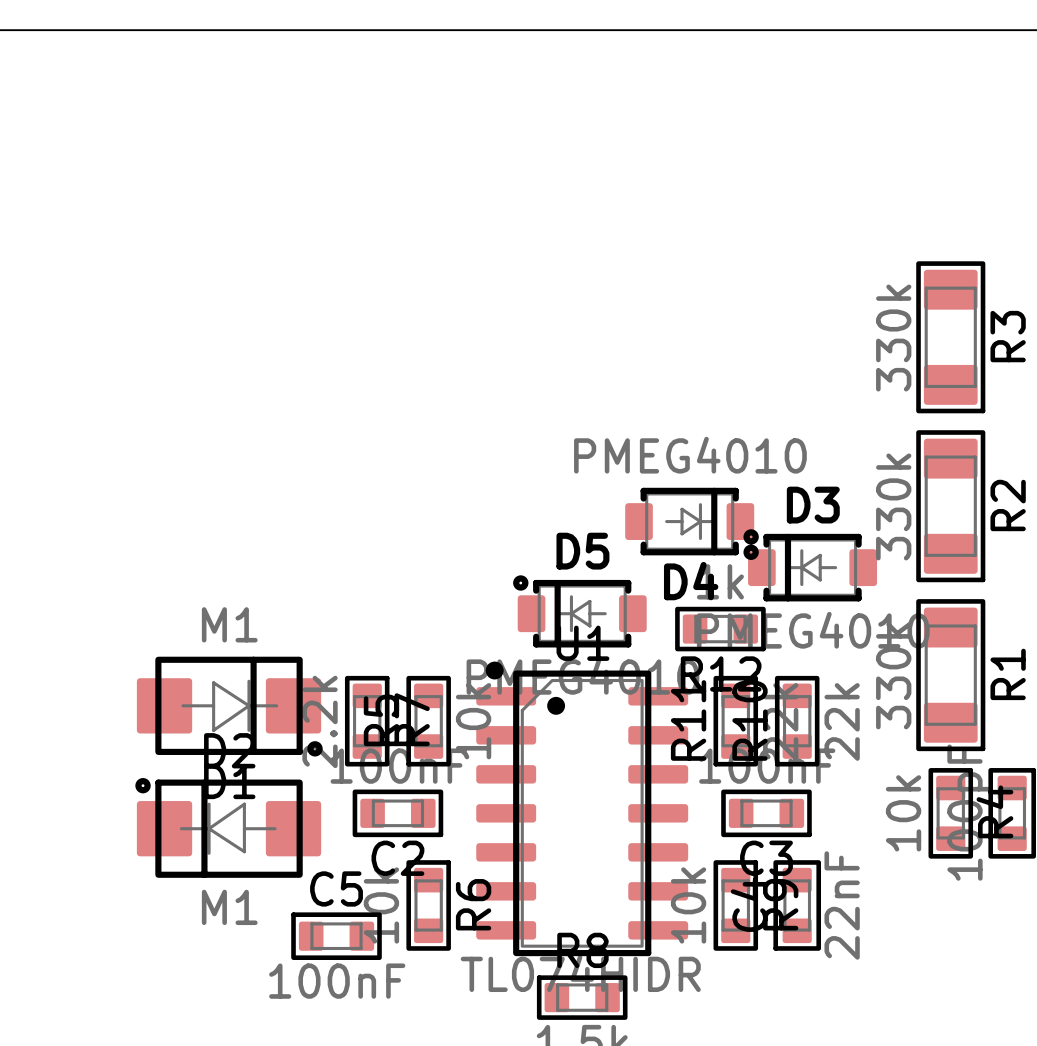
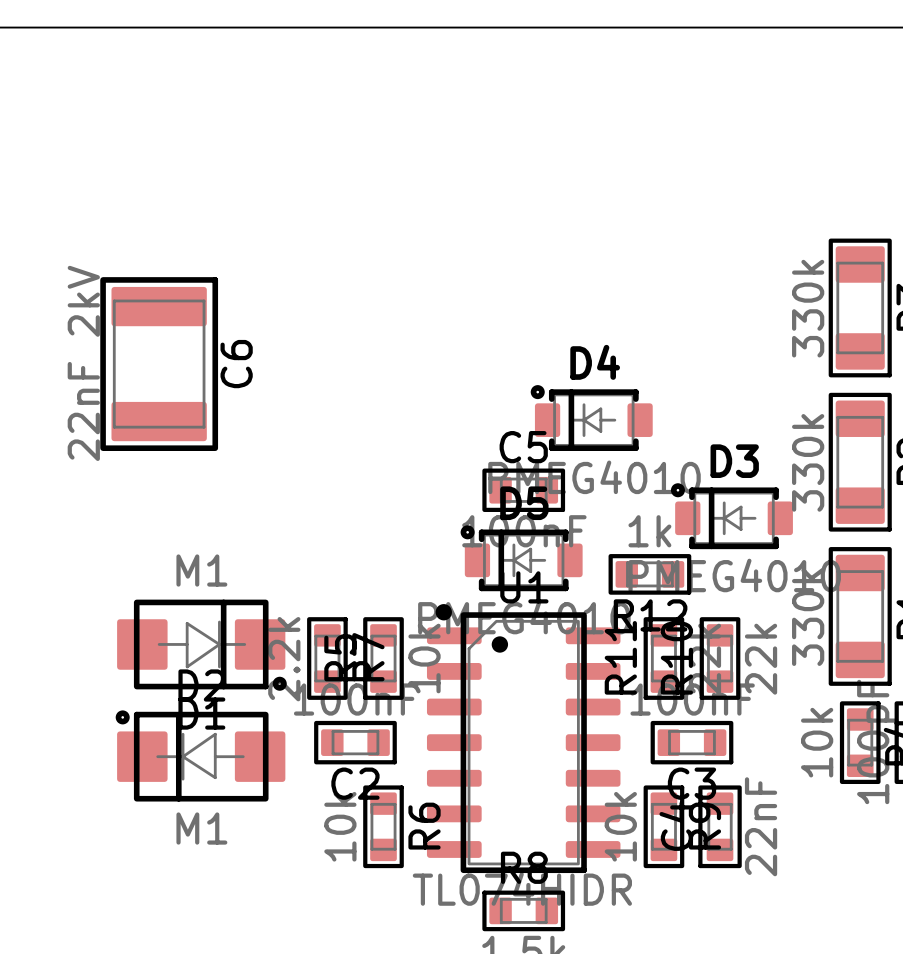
C6: none -> 22nF 2kV (159, 364)
D4 rotation: 0° (692, 523) -> 180° (591, 418)
C5 position: (336, 936) -> (523, 490)

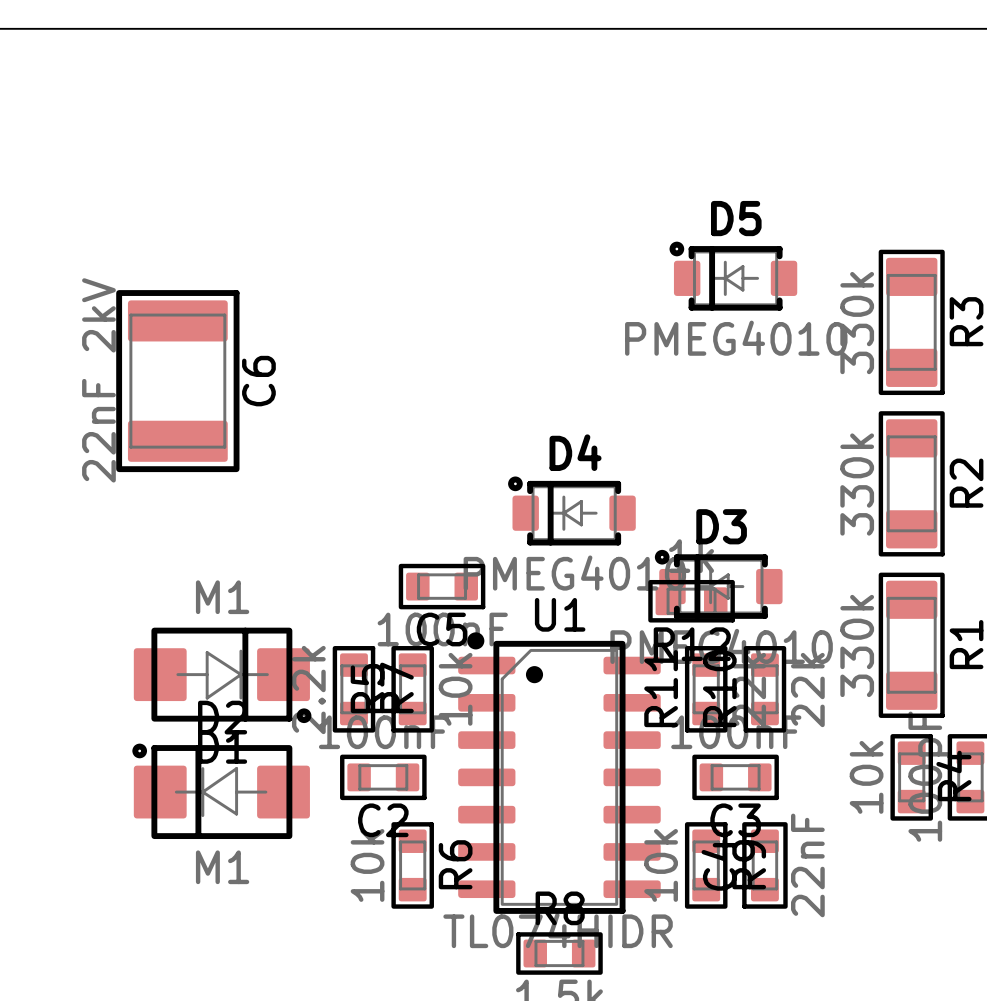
D4 position: (591, 418) -> (571, 510)
C5 name position: C5 (523, 447) -> C5 (442, 629)
C5 position: (523, 490) -> (442, 586)
D3 position: (731, 516) -> (718, 584)
D5 position: (521, 558) -> (733, 276)

